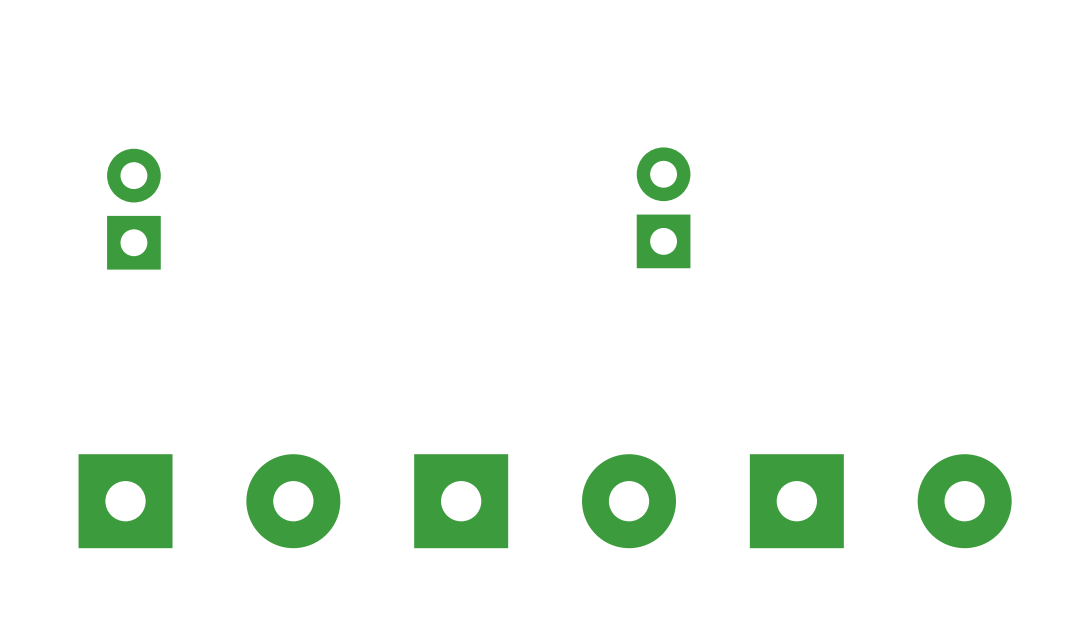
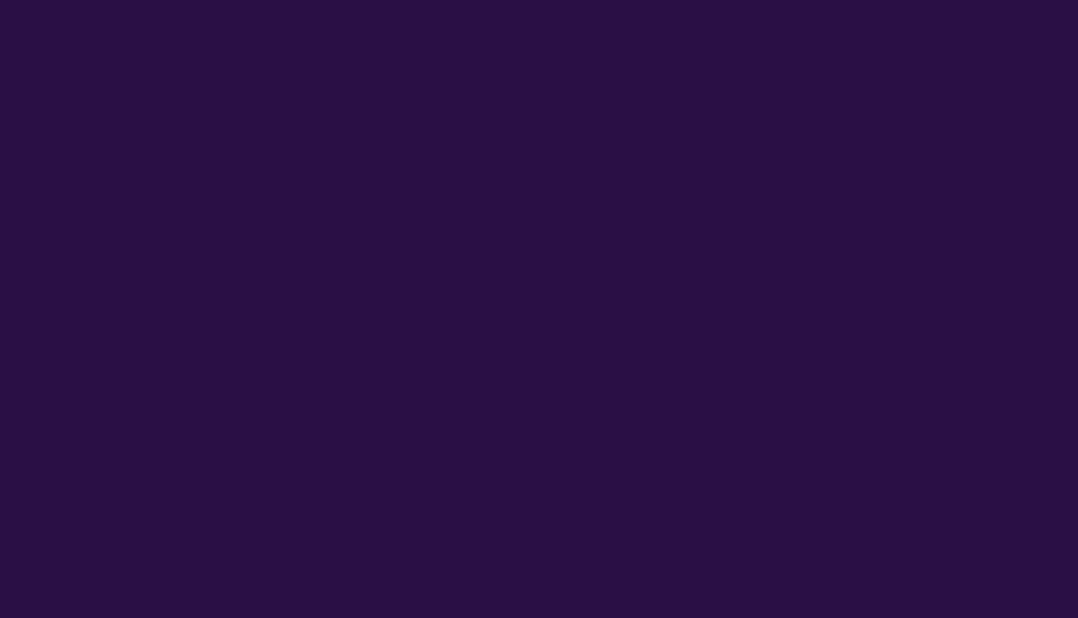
part: (663, 207) -> none
part: (133, 209) -> none
part: (209, 501) -> none
part: (545, 501) -> none
part: (880, 501) -> none

